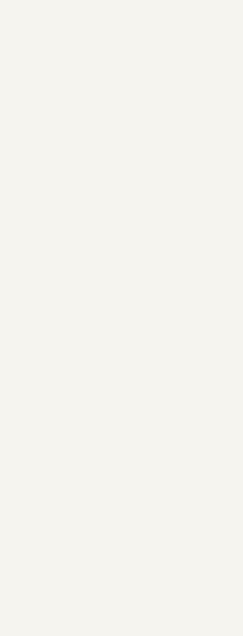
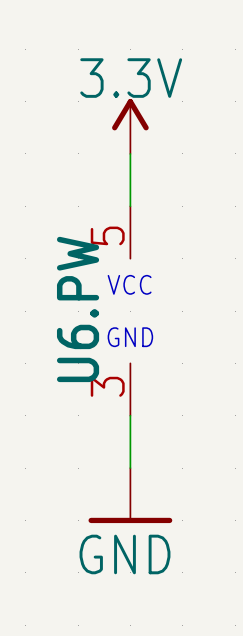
power symbol: none -> 3.3V (130, 126)
wire: none -> (130, 153) (130, 206)
U6.PW: none -> (130, 311)
wire: none -> (130, 415) (130, 468)
power symbol: none -> GND (130, 495)

